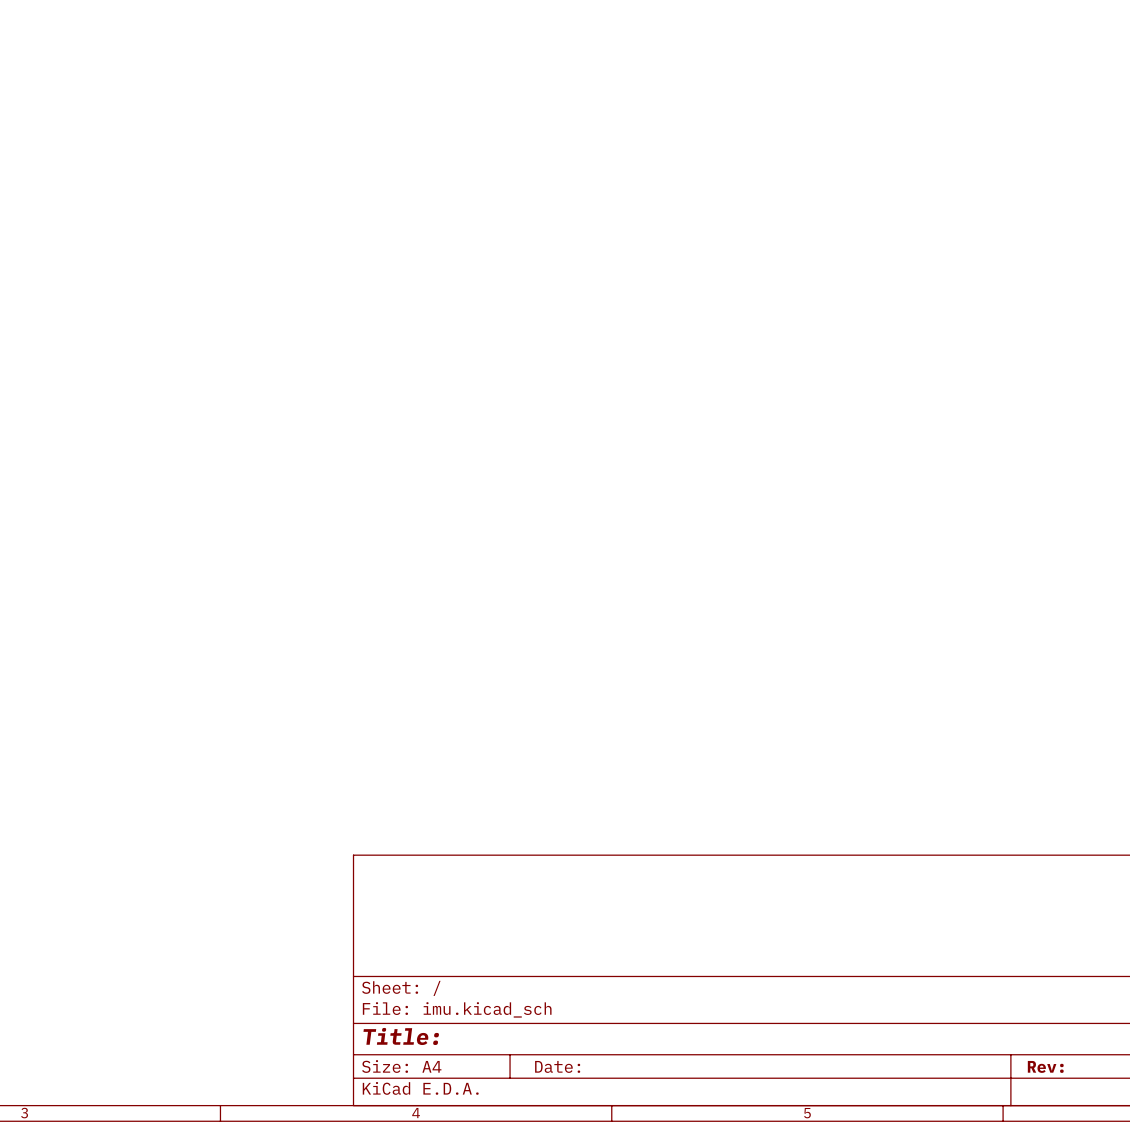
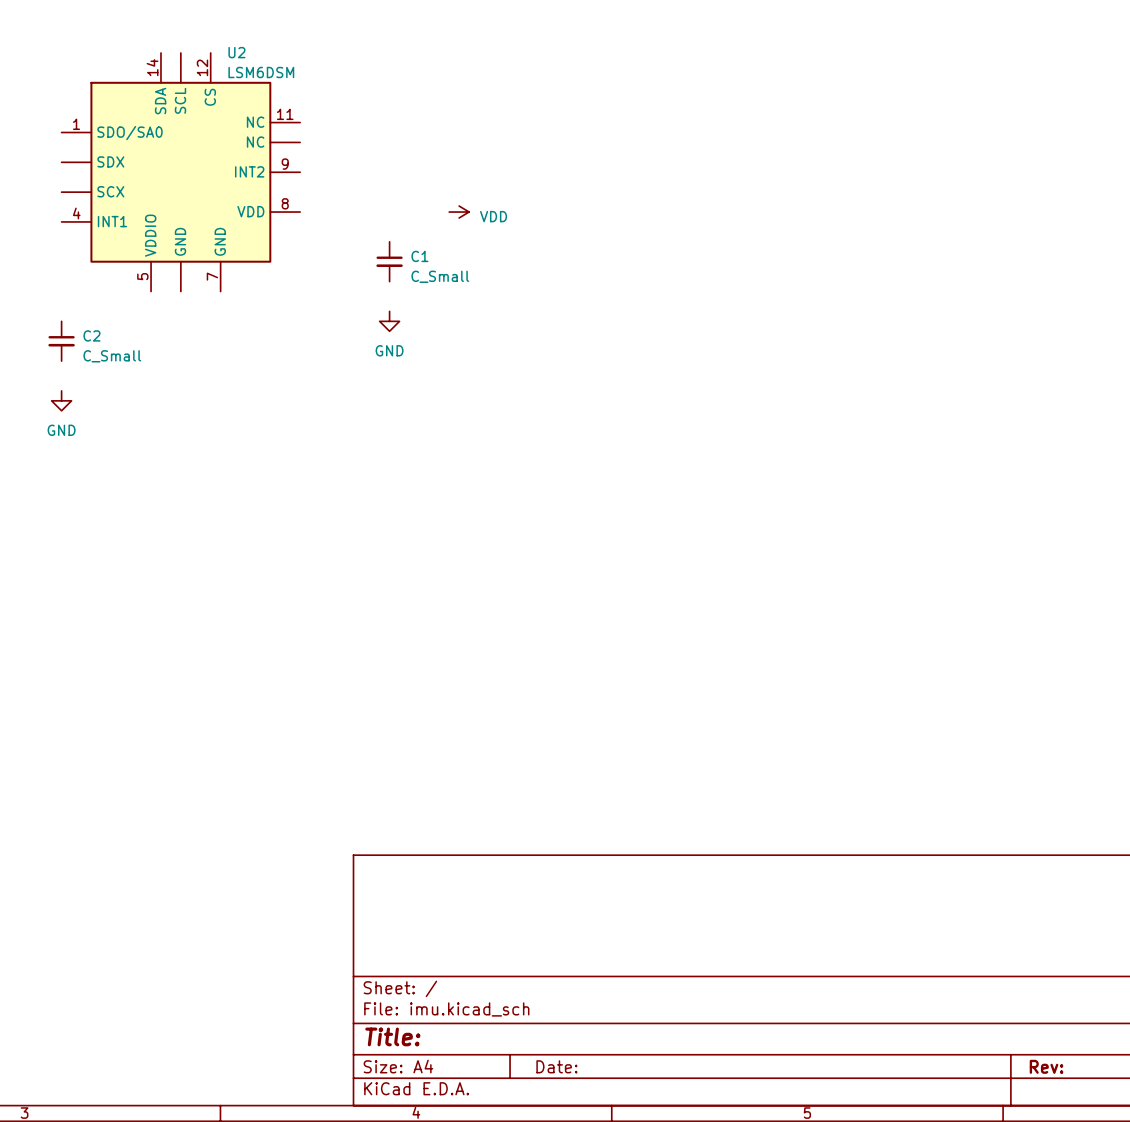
U2: none -> LSM6DSM (180, 172)
power symbol: none -> VDD (459, 212)
C1: none -> C_Small (389, 261)
power symbol: none -> GND (389, 321)
C2: none -> C_Small (61, 341)
power symbol: none -> GND (61, 400)

